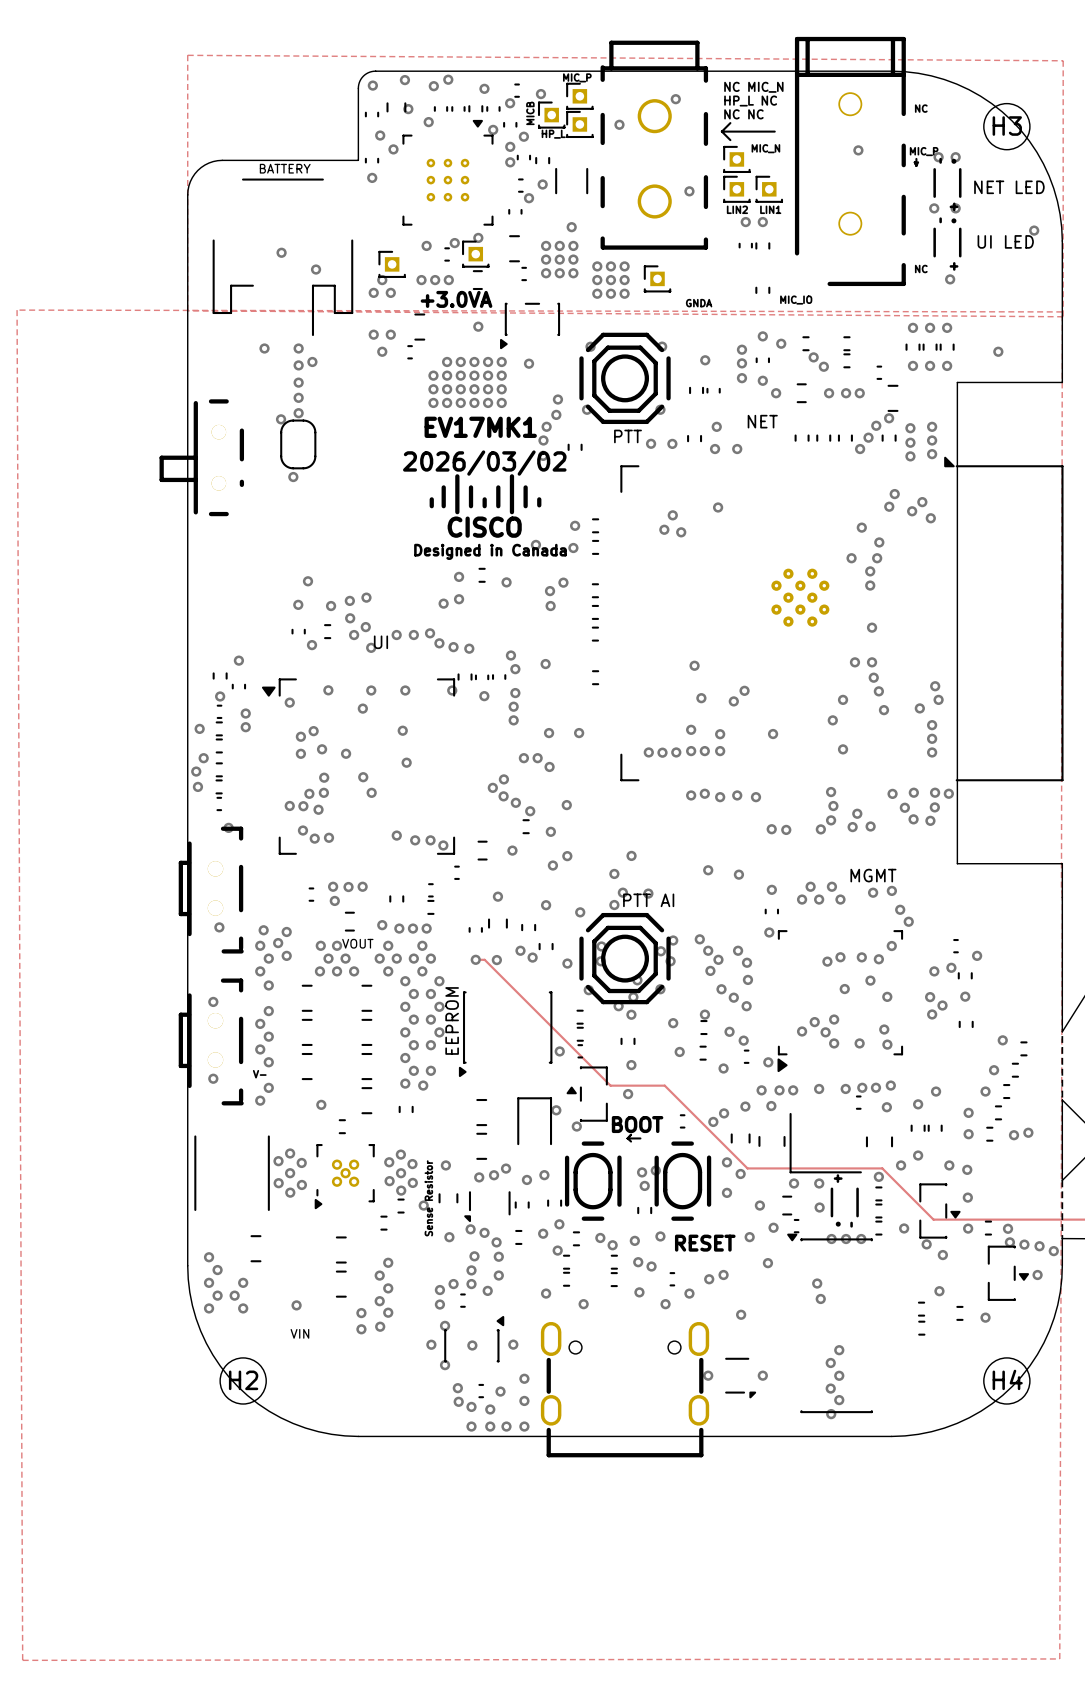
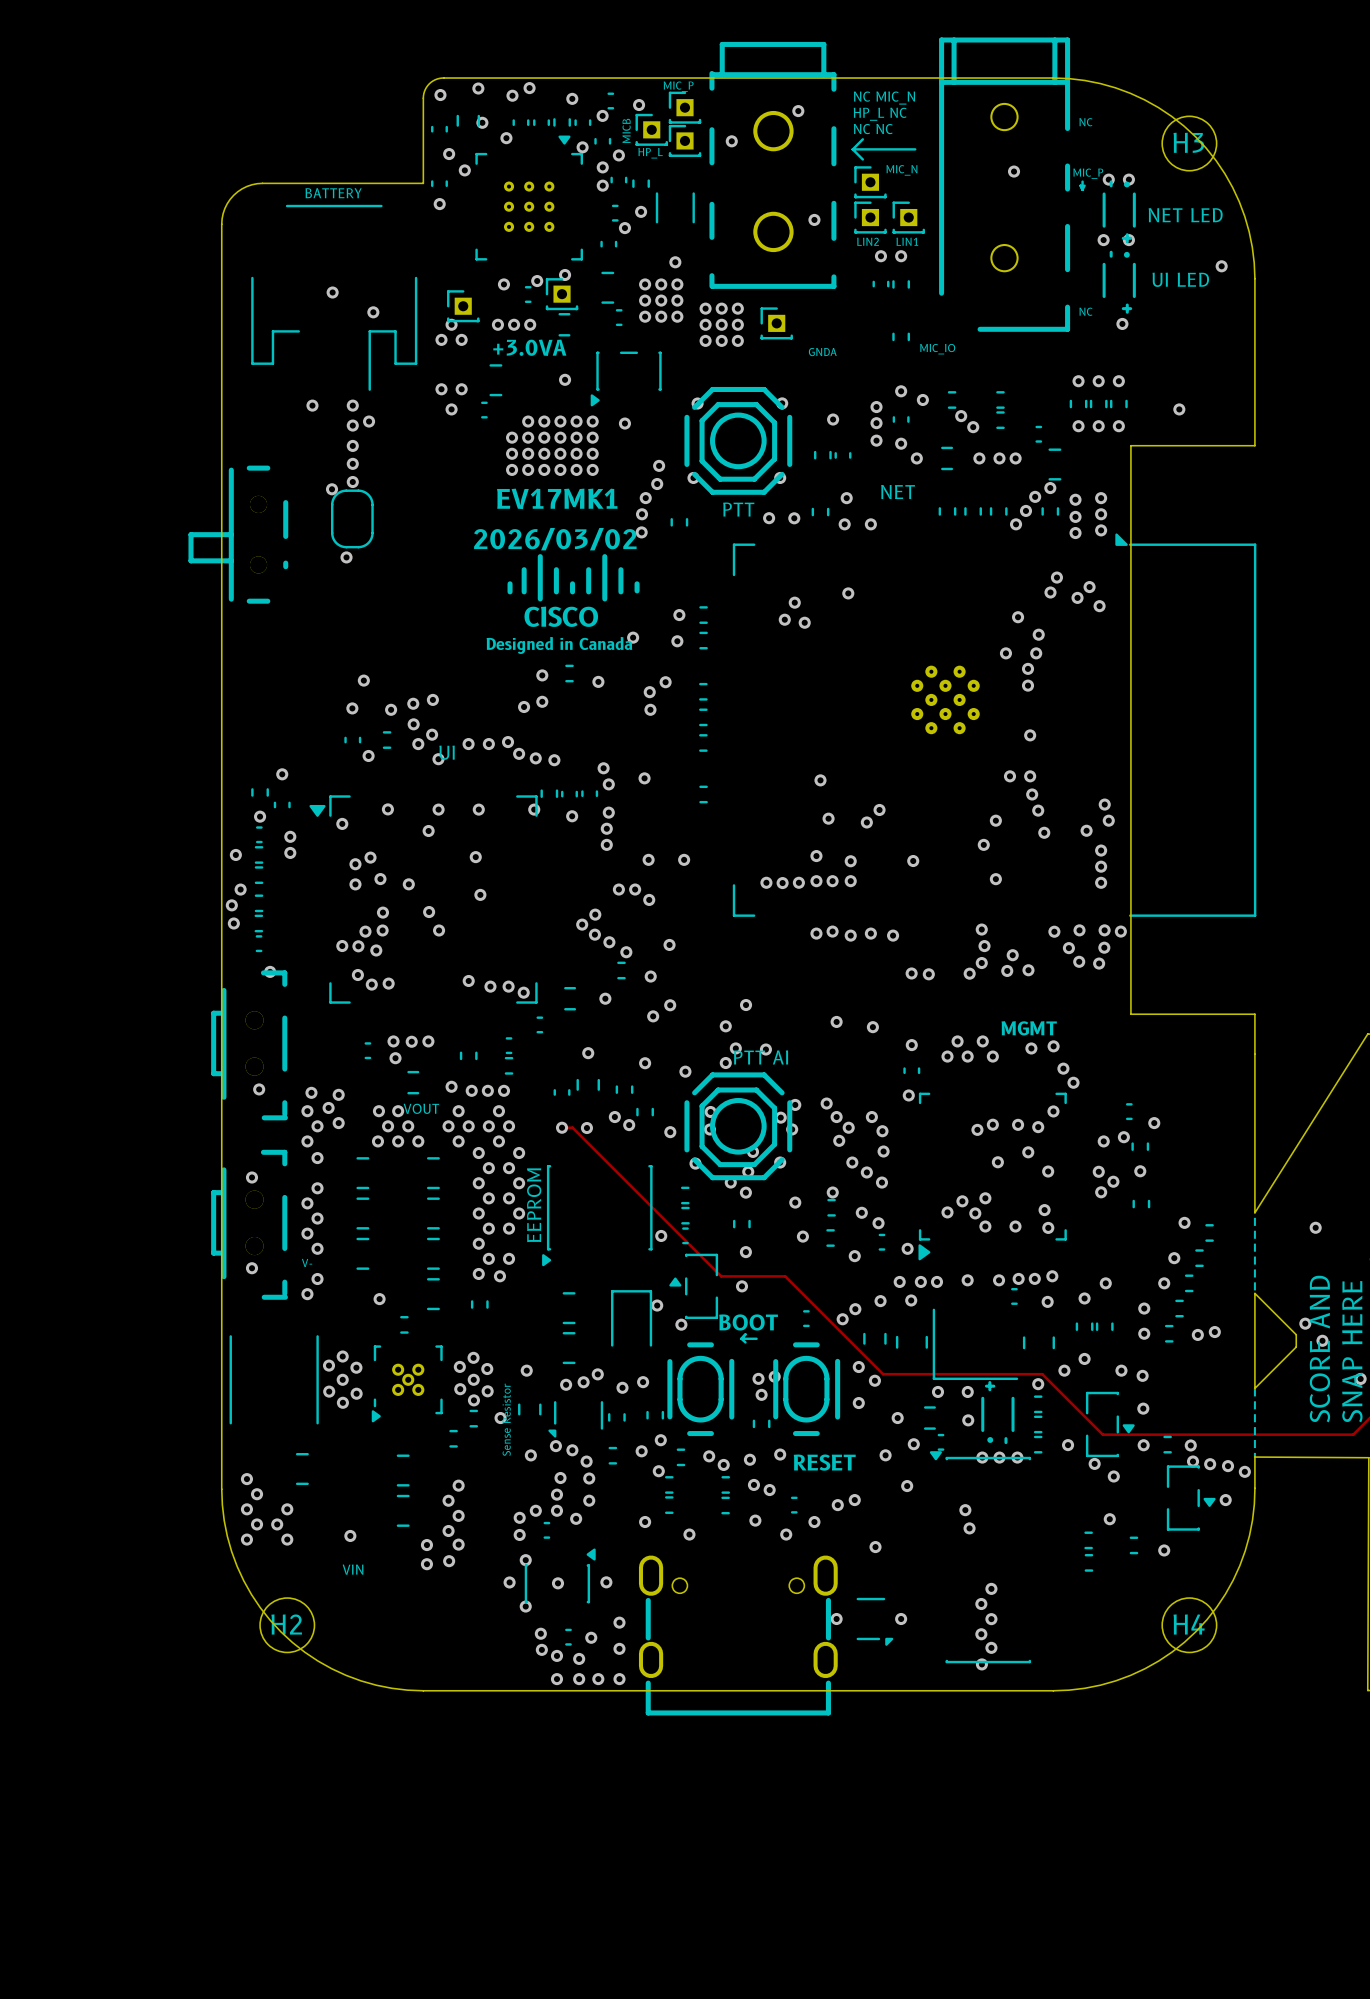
zone outline: (187, 55) (1063, 60) (1063, 316) (187, 310) (187, 55) -> none
zone outline: (1062, 896) (1059, 1658) (22, 1660) (17, 310) (1062, 311) (1062, 896) -> none

